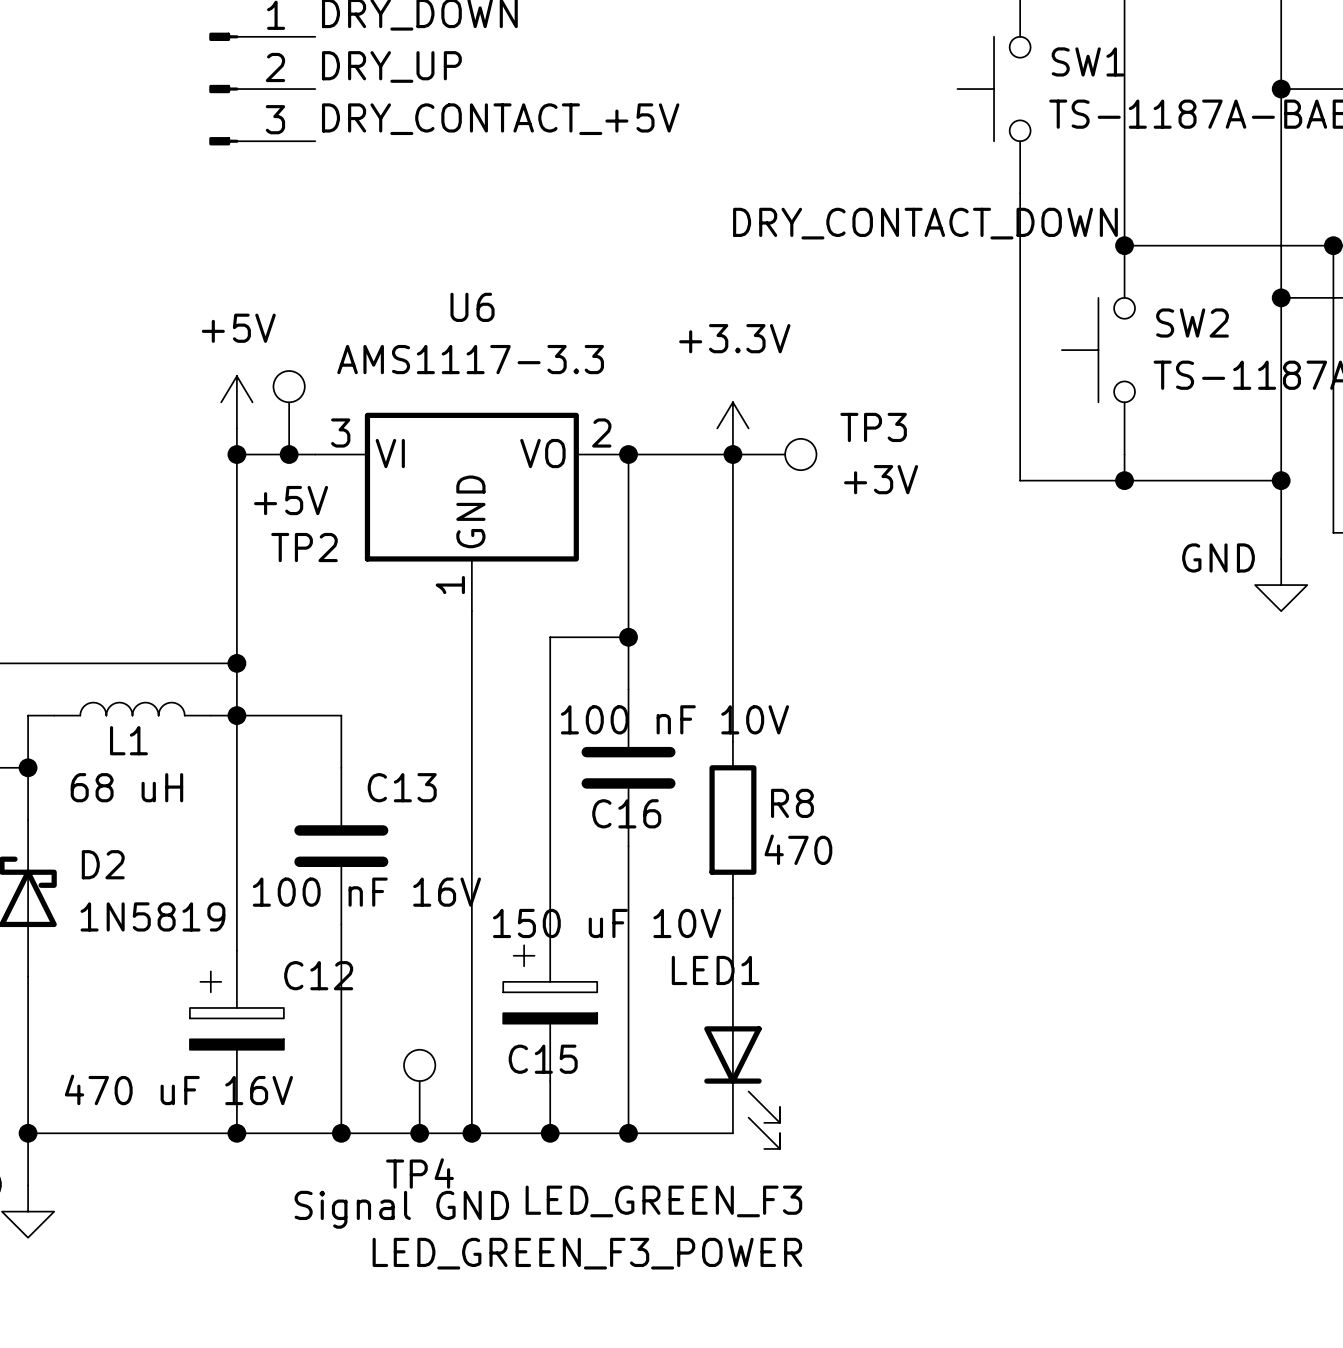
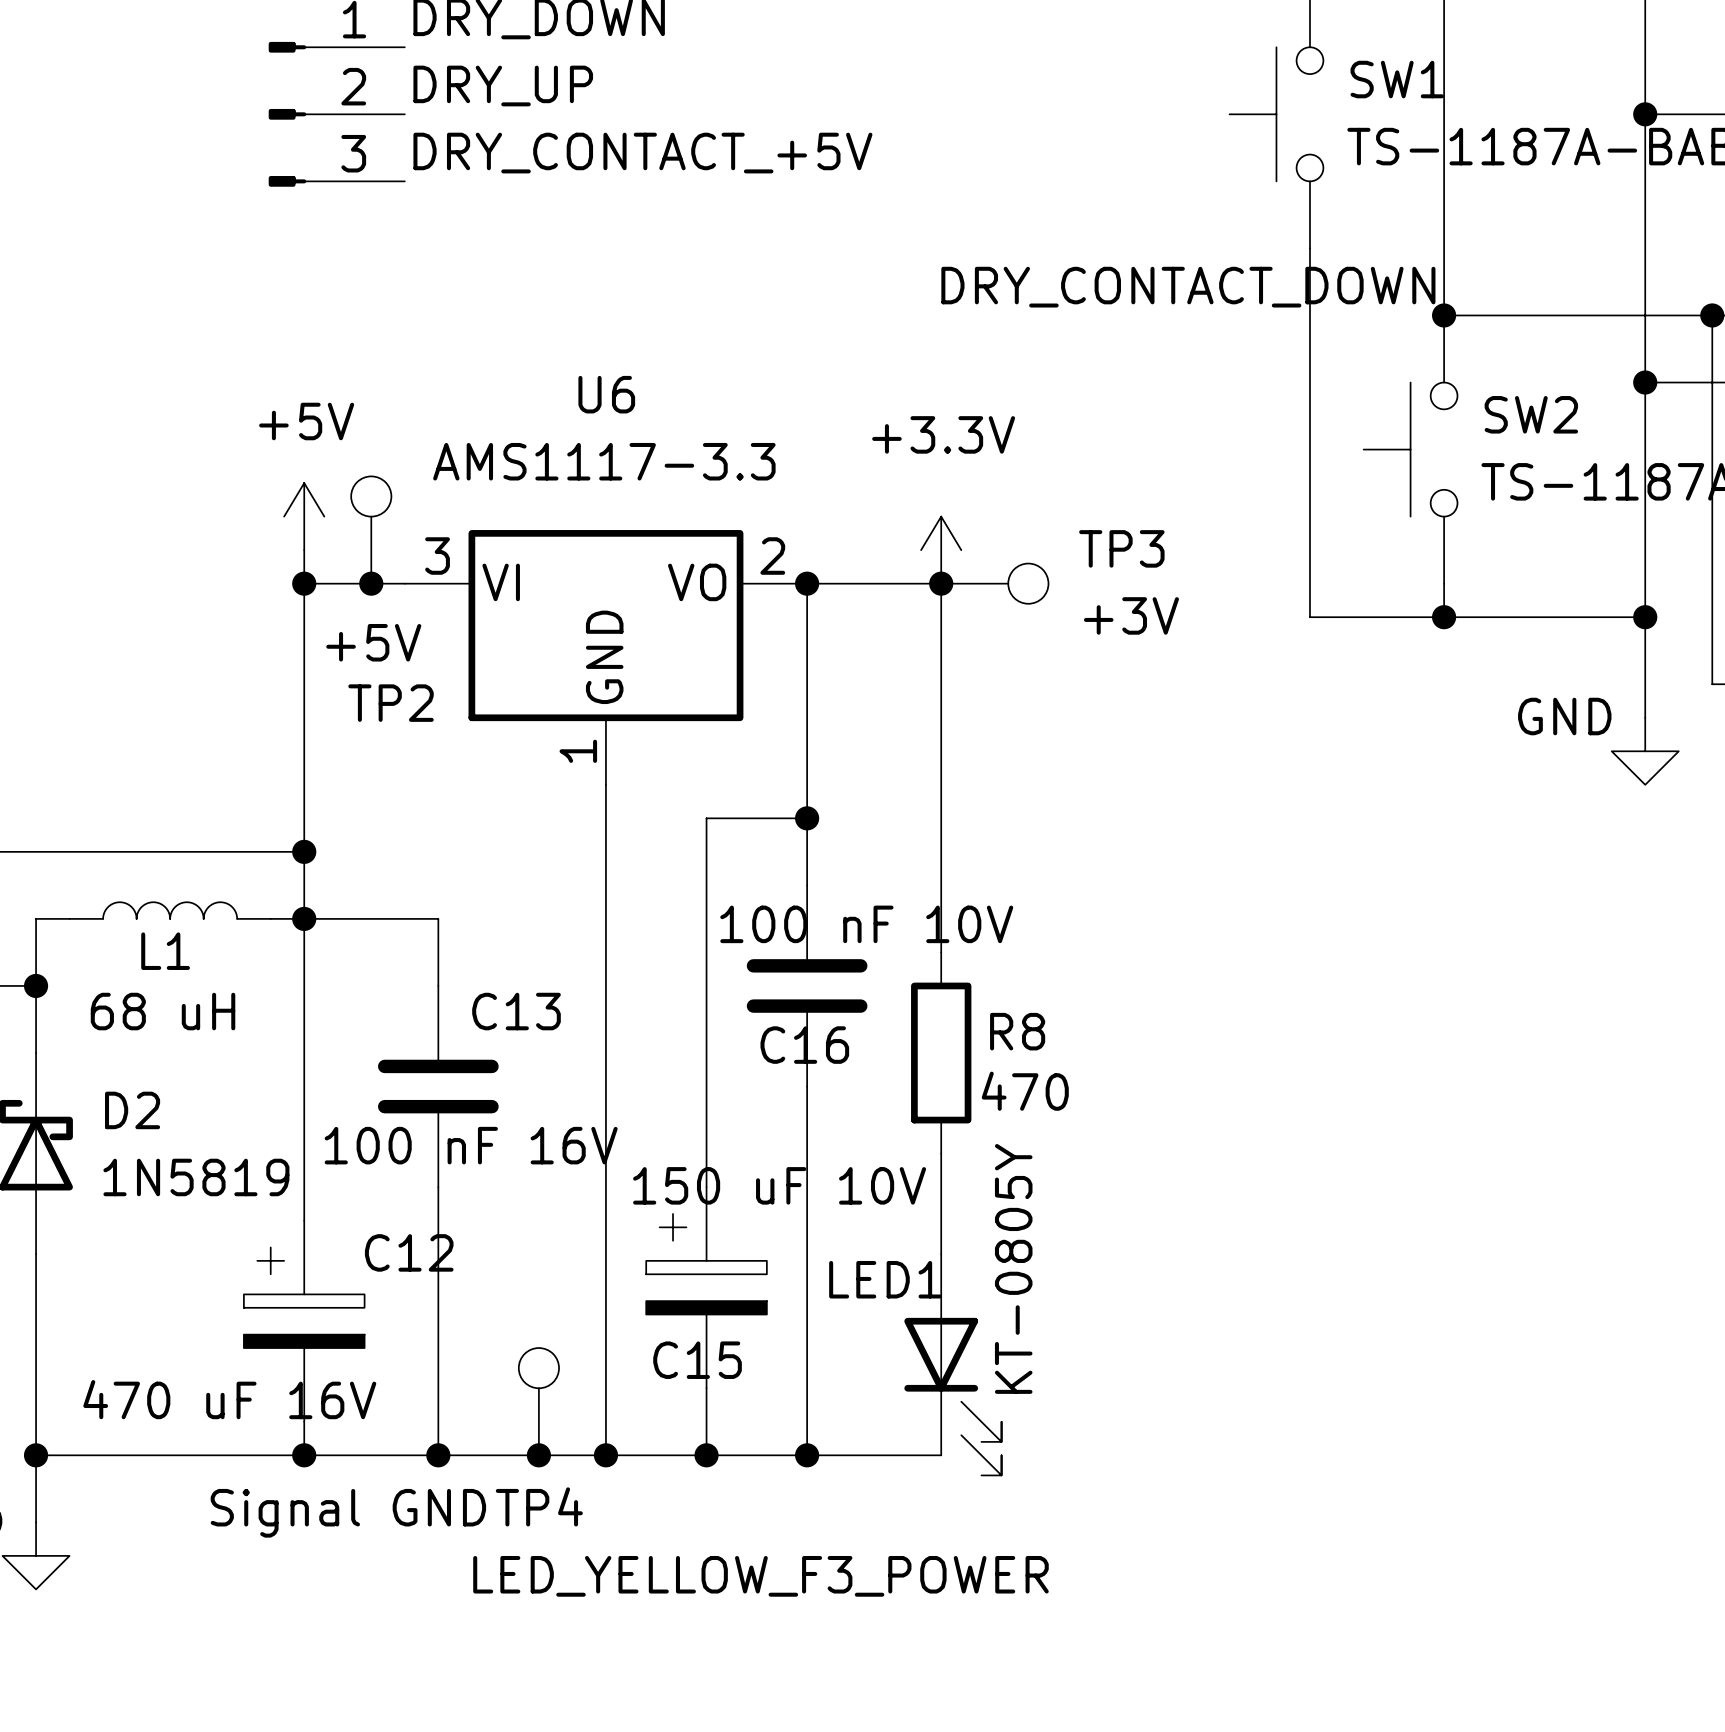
LED1 name position: LED1 (715, 970) -> LED1 (885, 1279)
LED1 value: LED_GREEN_F3 (663, 1201) -> KT-0805Y (1013, 1268)
TP4 value position: Signal GND (401, 1209) -> Signal GND (348, 1513)
LED1 text: LED_GREEN_F3_POWER (587, 1253) -> LED_YELLOW_F3_POWER (760, 1576)

